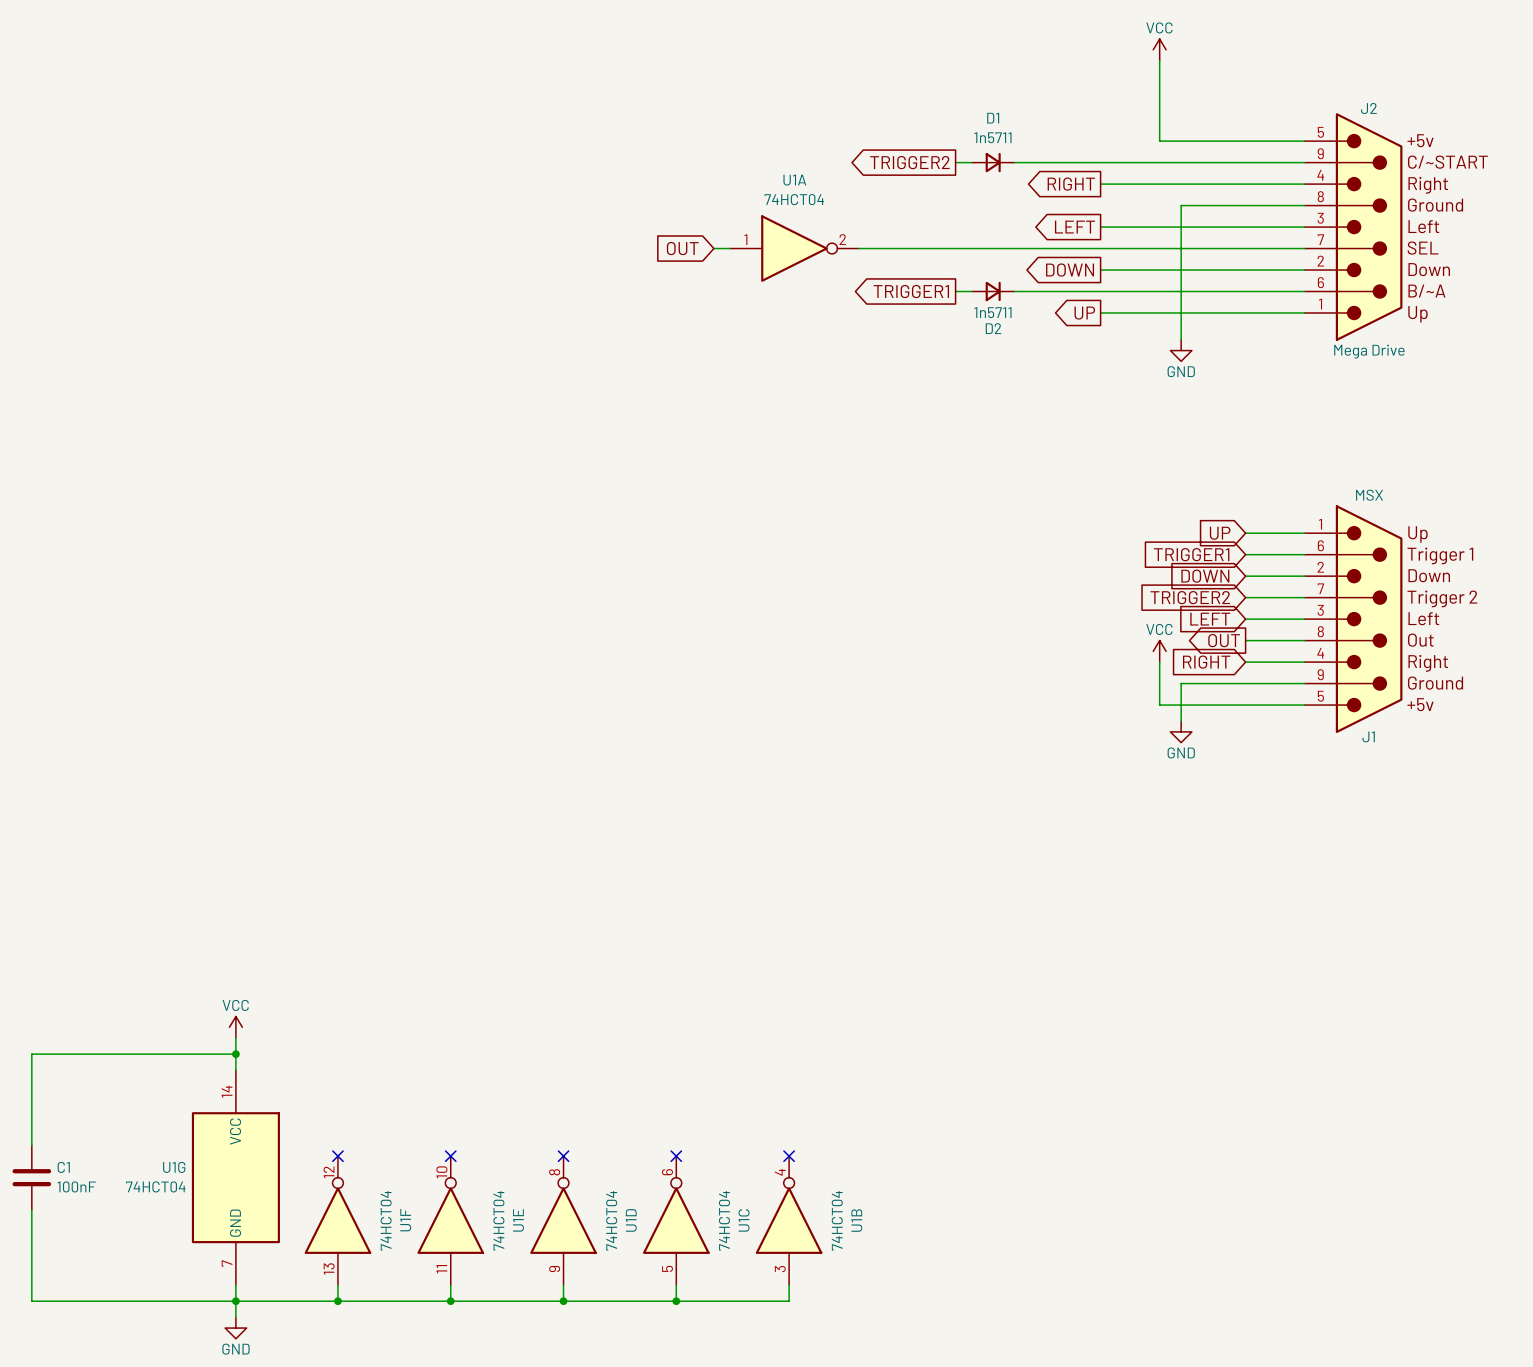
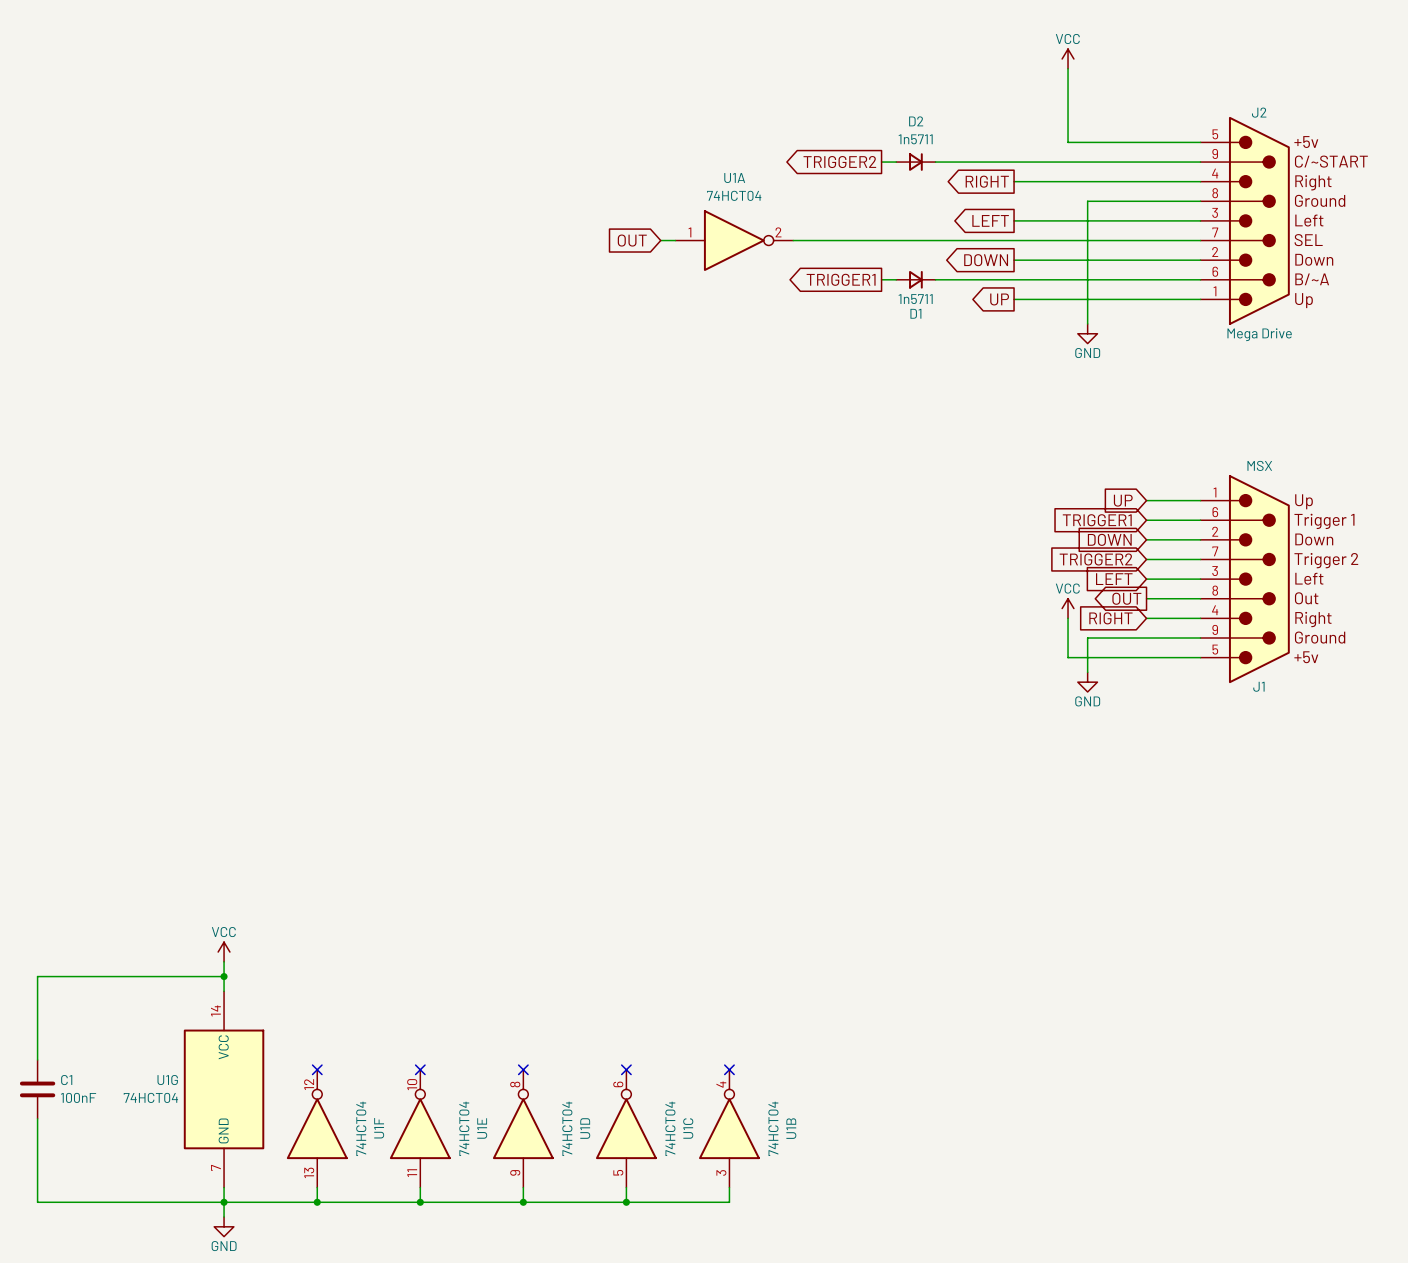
D1 name: D1 (993, 118) -> D2 (916, 121)
D2 name: D2 (993, 328) -> D1 (915, 313)

